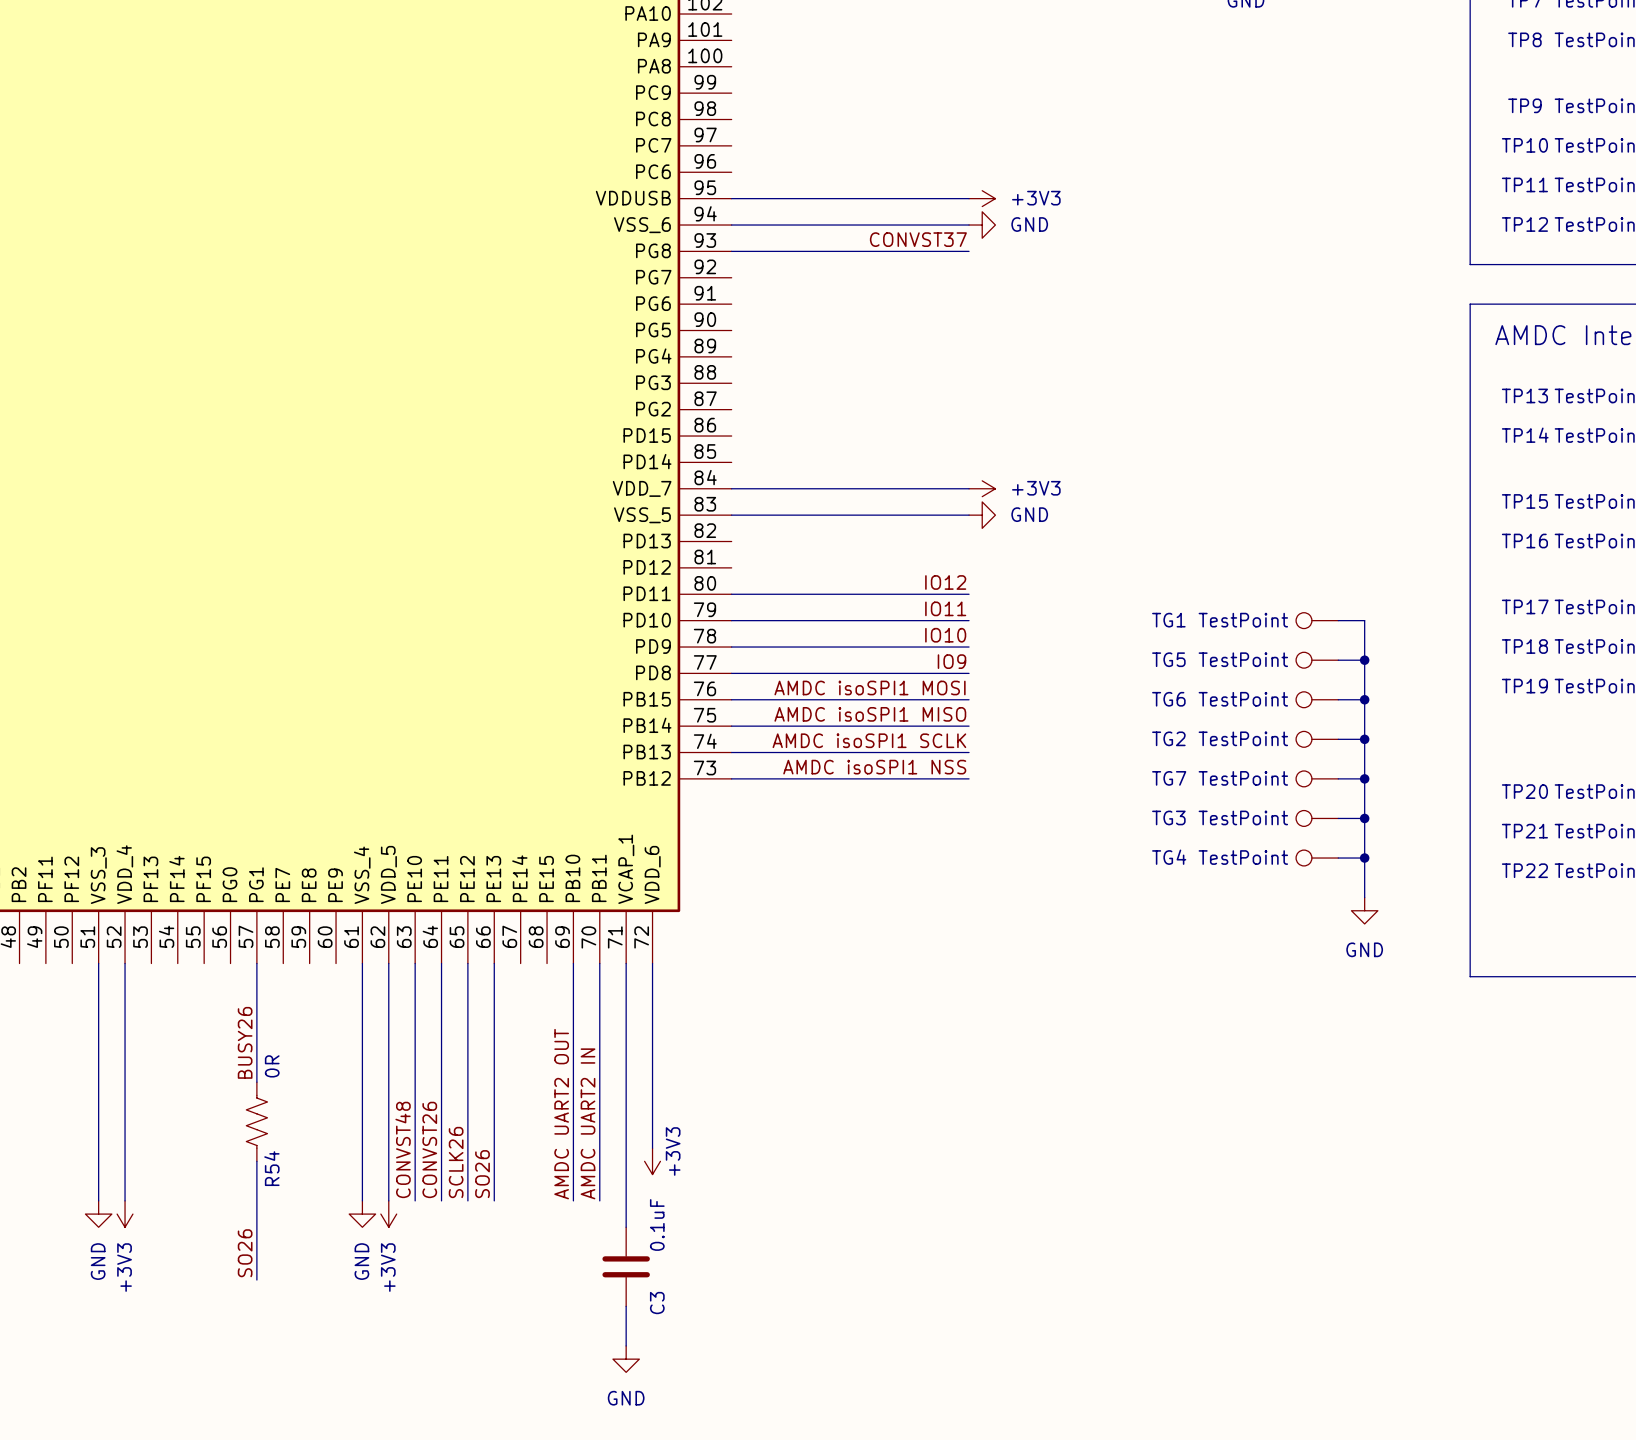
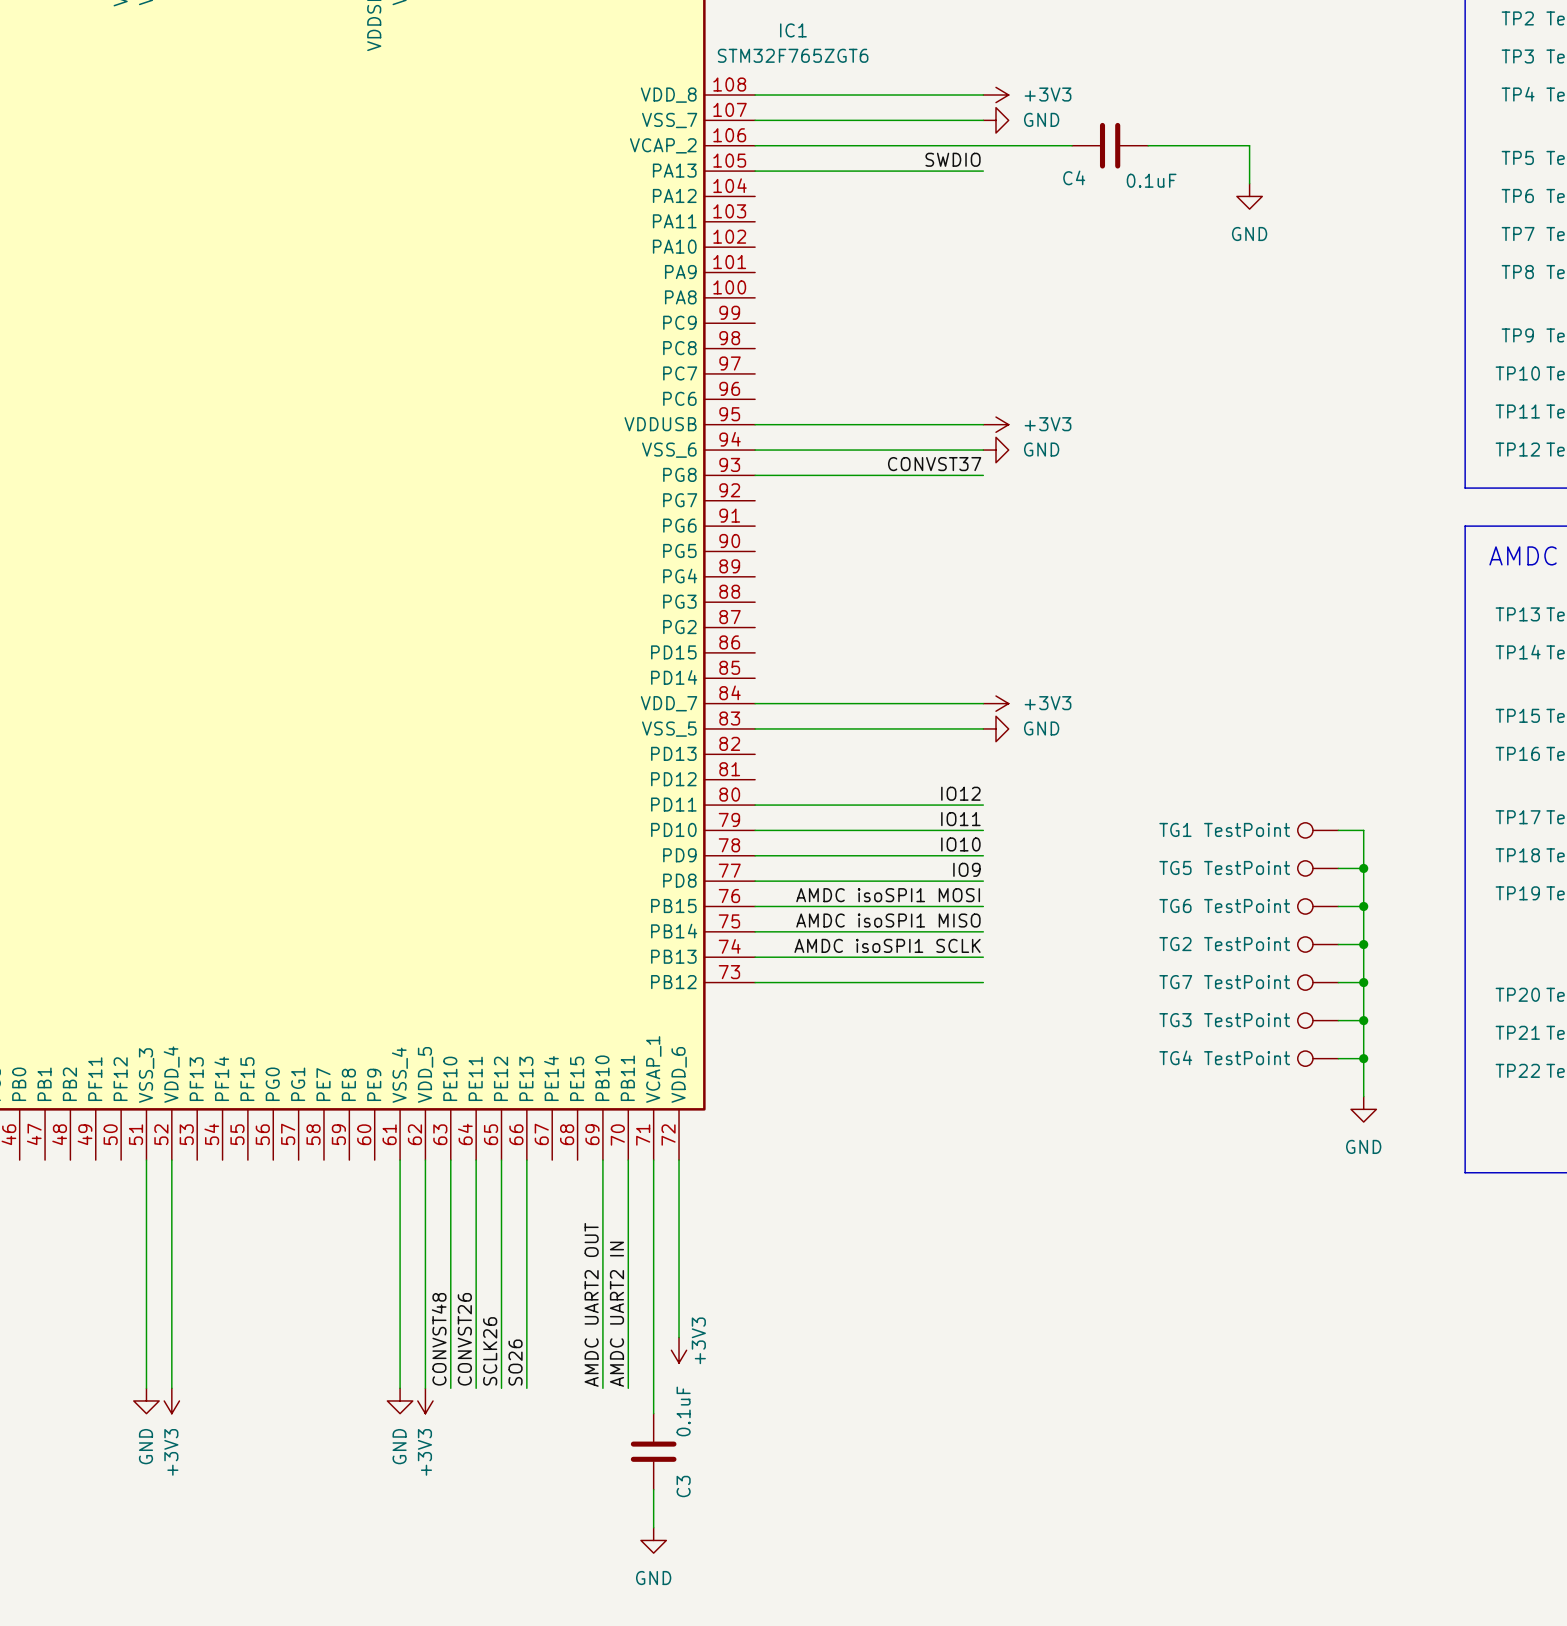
label: AMDC isoSPI1 NSS (874, 767) -> none
wire: (256, 963) (256, 1082) -> none
label: BUSY26 (245, 1042) -> none
R54: 0R (256, 1121) -> none
wire: (256, 1161) (256, 1280) -> none
label: SO26 (245, 1253) -> none

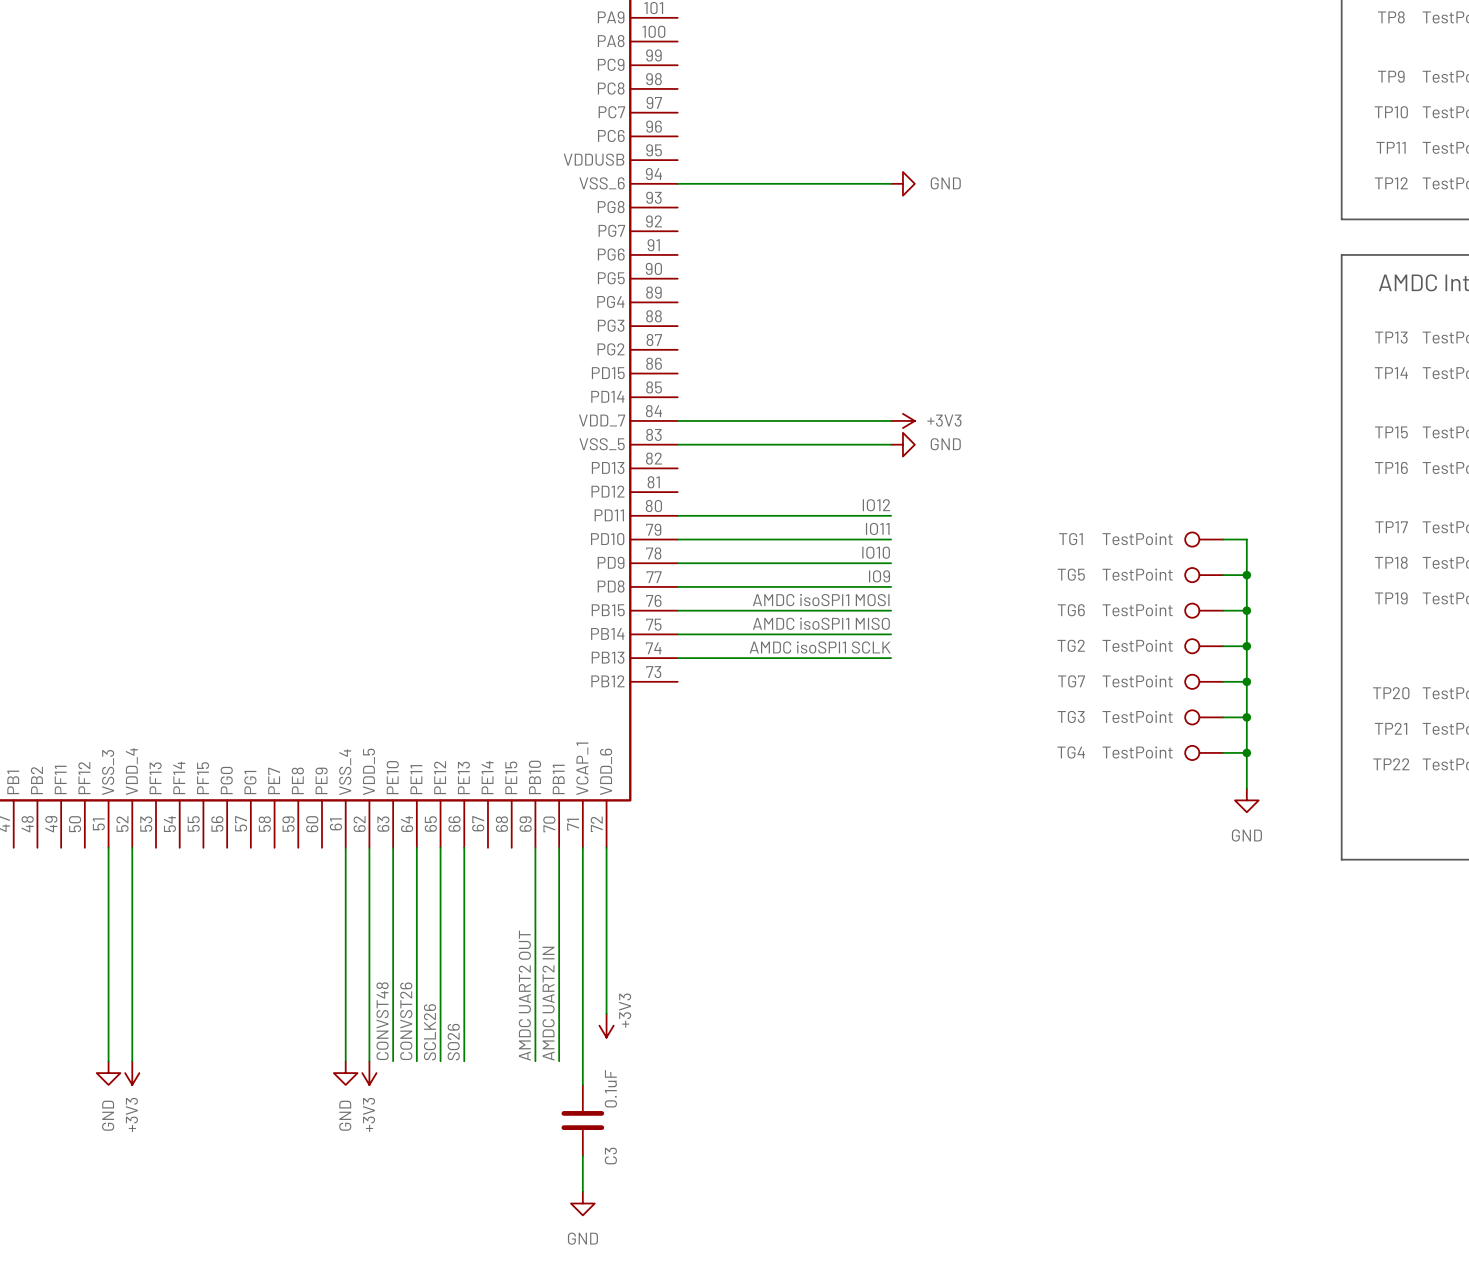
wire: (755, 424) (983, 424) -> none
power symbol: +3V3 (996, 424) -> none
label: CONVST37 (934, 464) -> none
wire: (755, 475) (983, 475) -> none
wire: (755, 982) (983, 982) -> none

